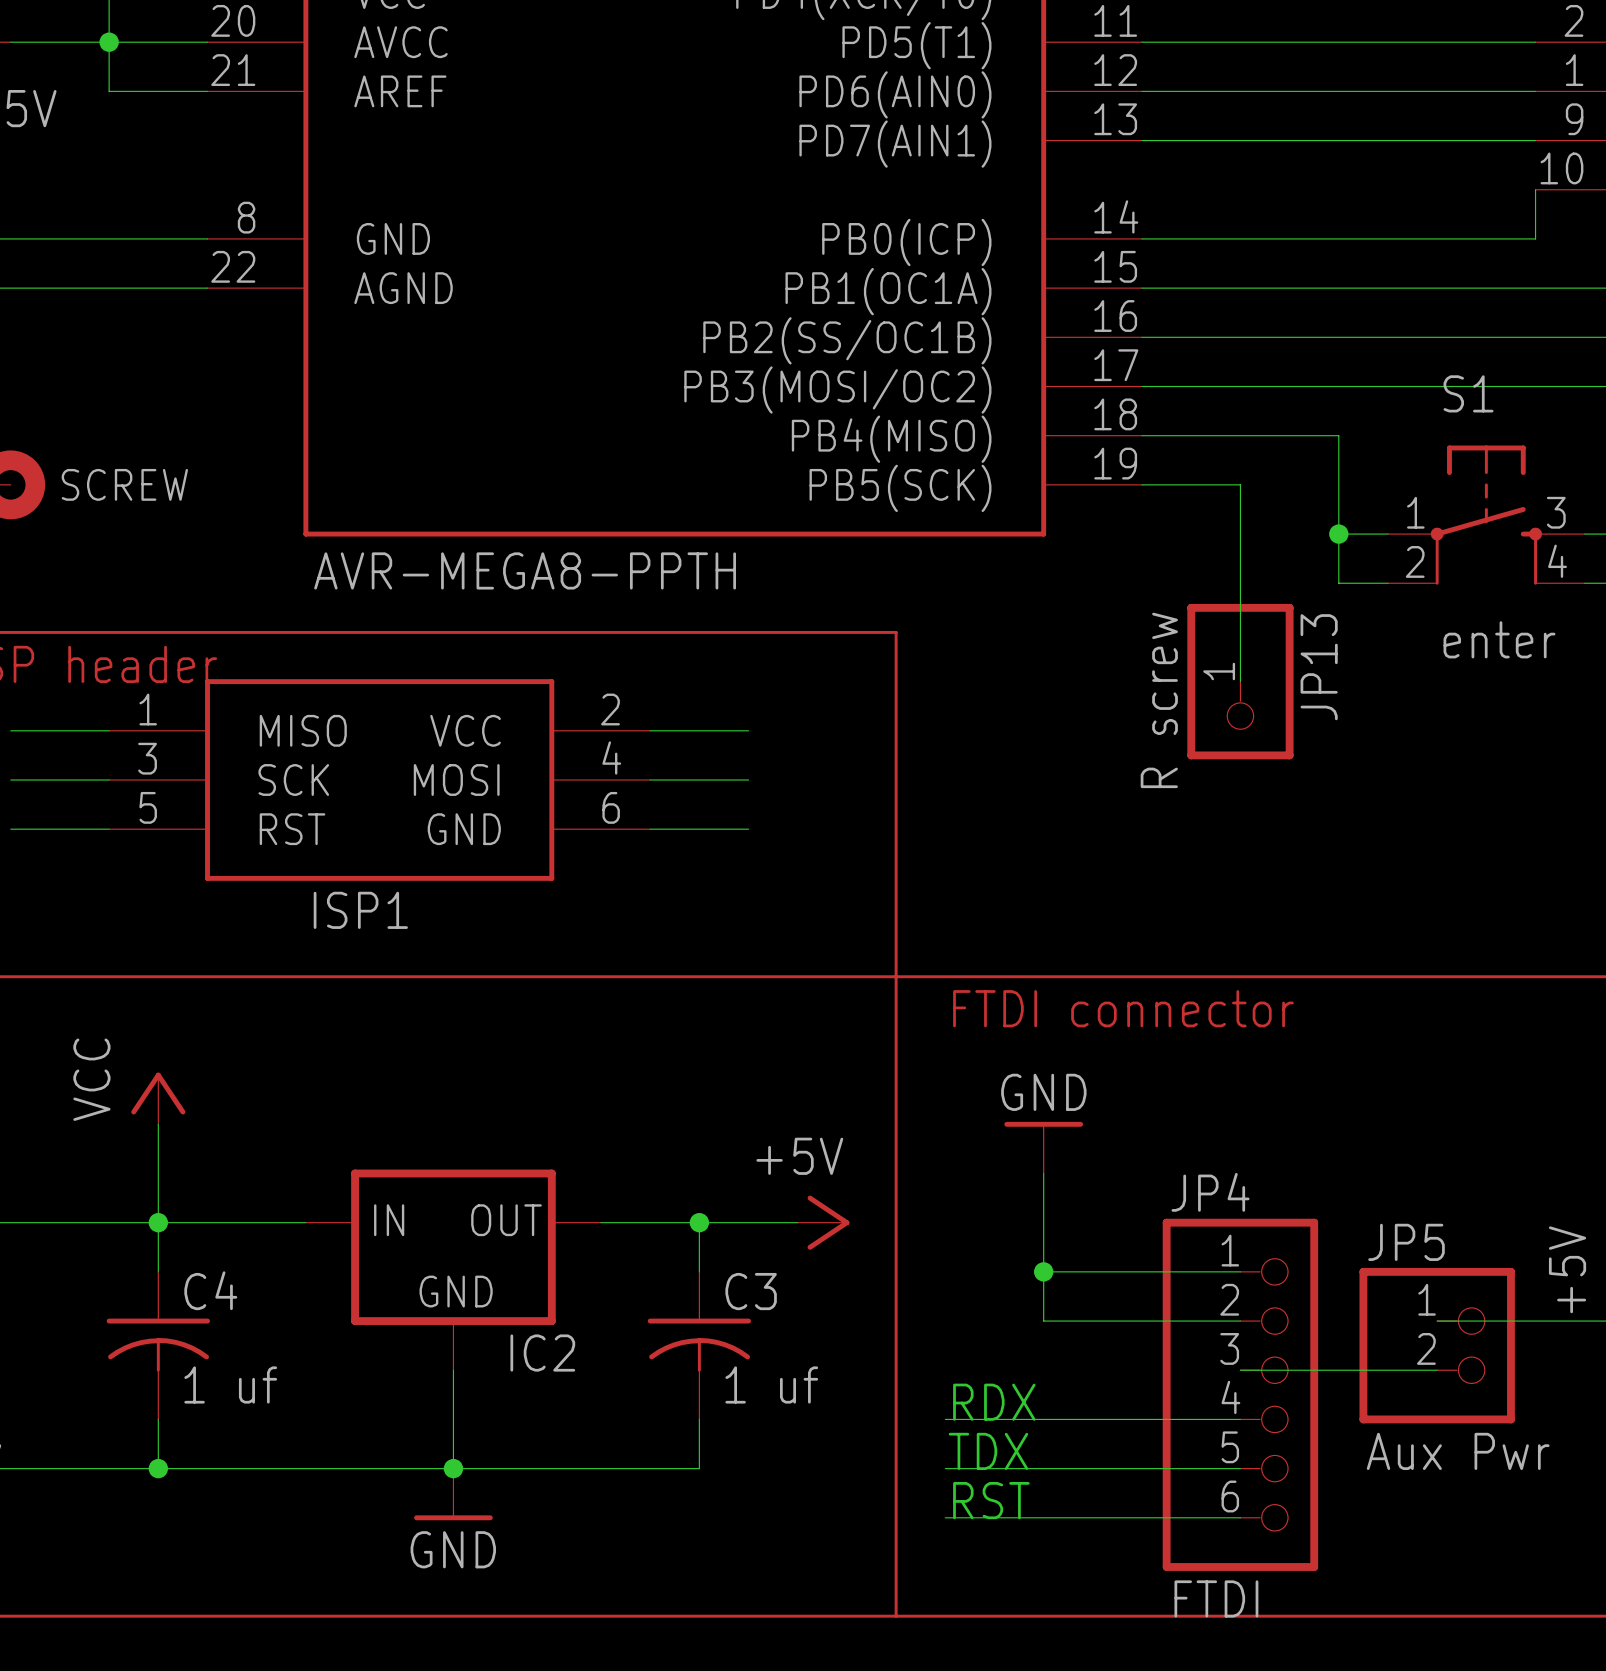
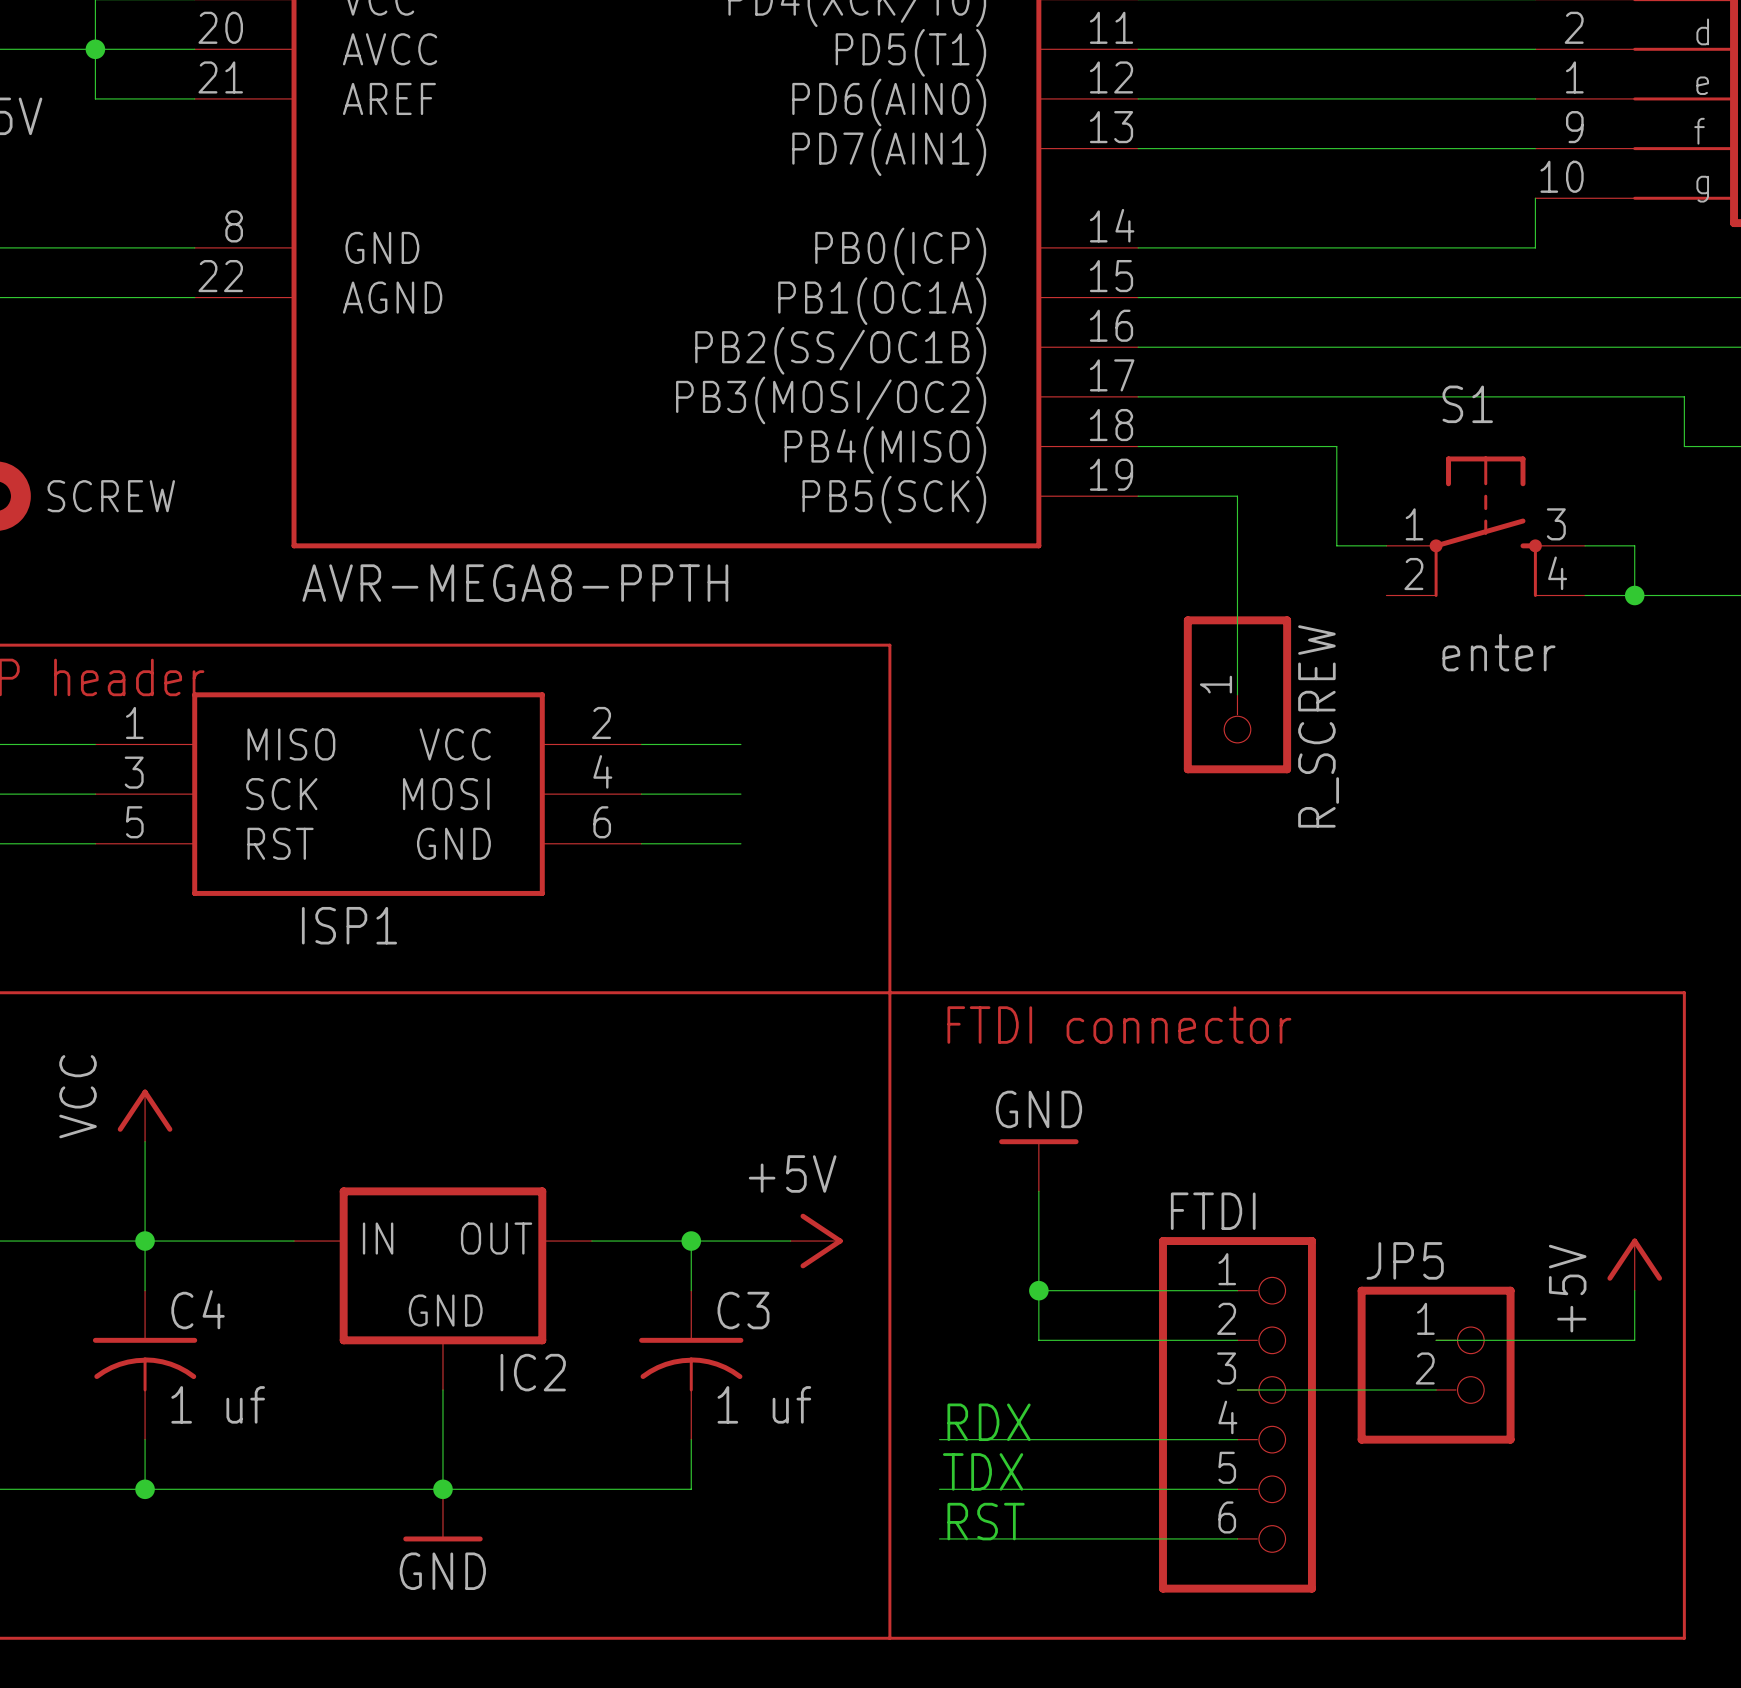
wire: (1338, 534) (1338, 583) (1387, 583) -> none
junction: (1338, 534) -> none
JP13 name: JP13 (1319, 667) -> R_SCREW (1318, 726)
JP13 value: R screw (1159, 700) -> none
JP4 name: JP4 (1210, 1192) -> FTDI (1213, 1211)
JP5 value: Aux Pwr (1458, 1451) -> none
JP4 value: FTDI (1216, 1598) -> none

